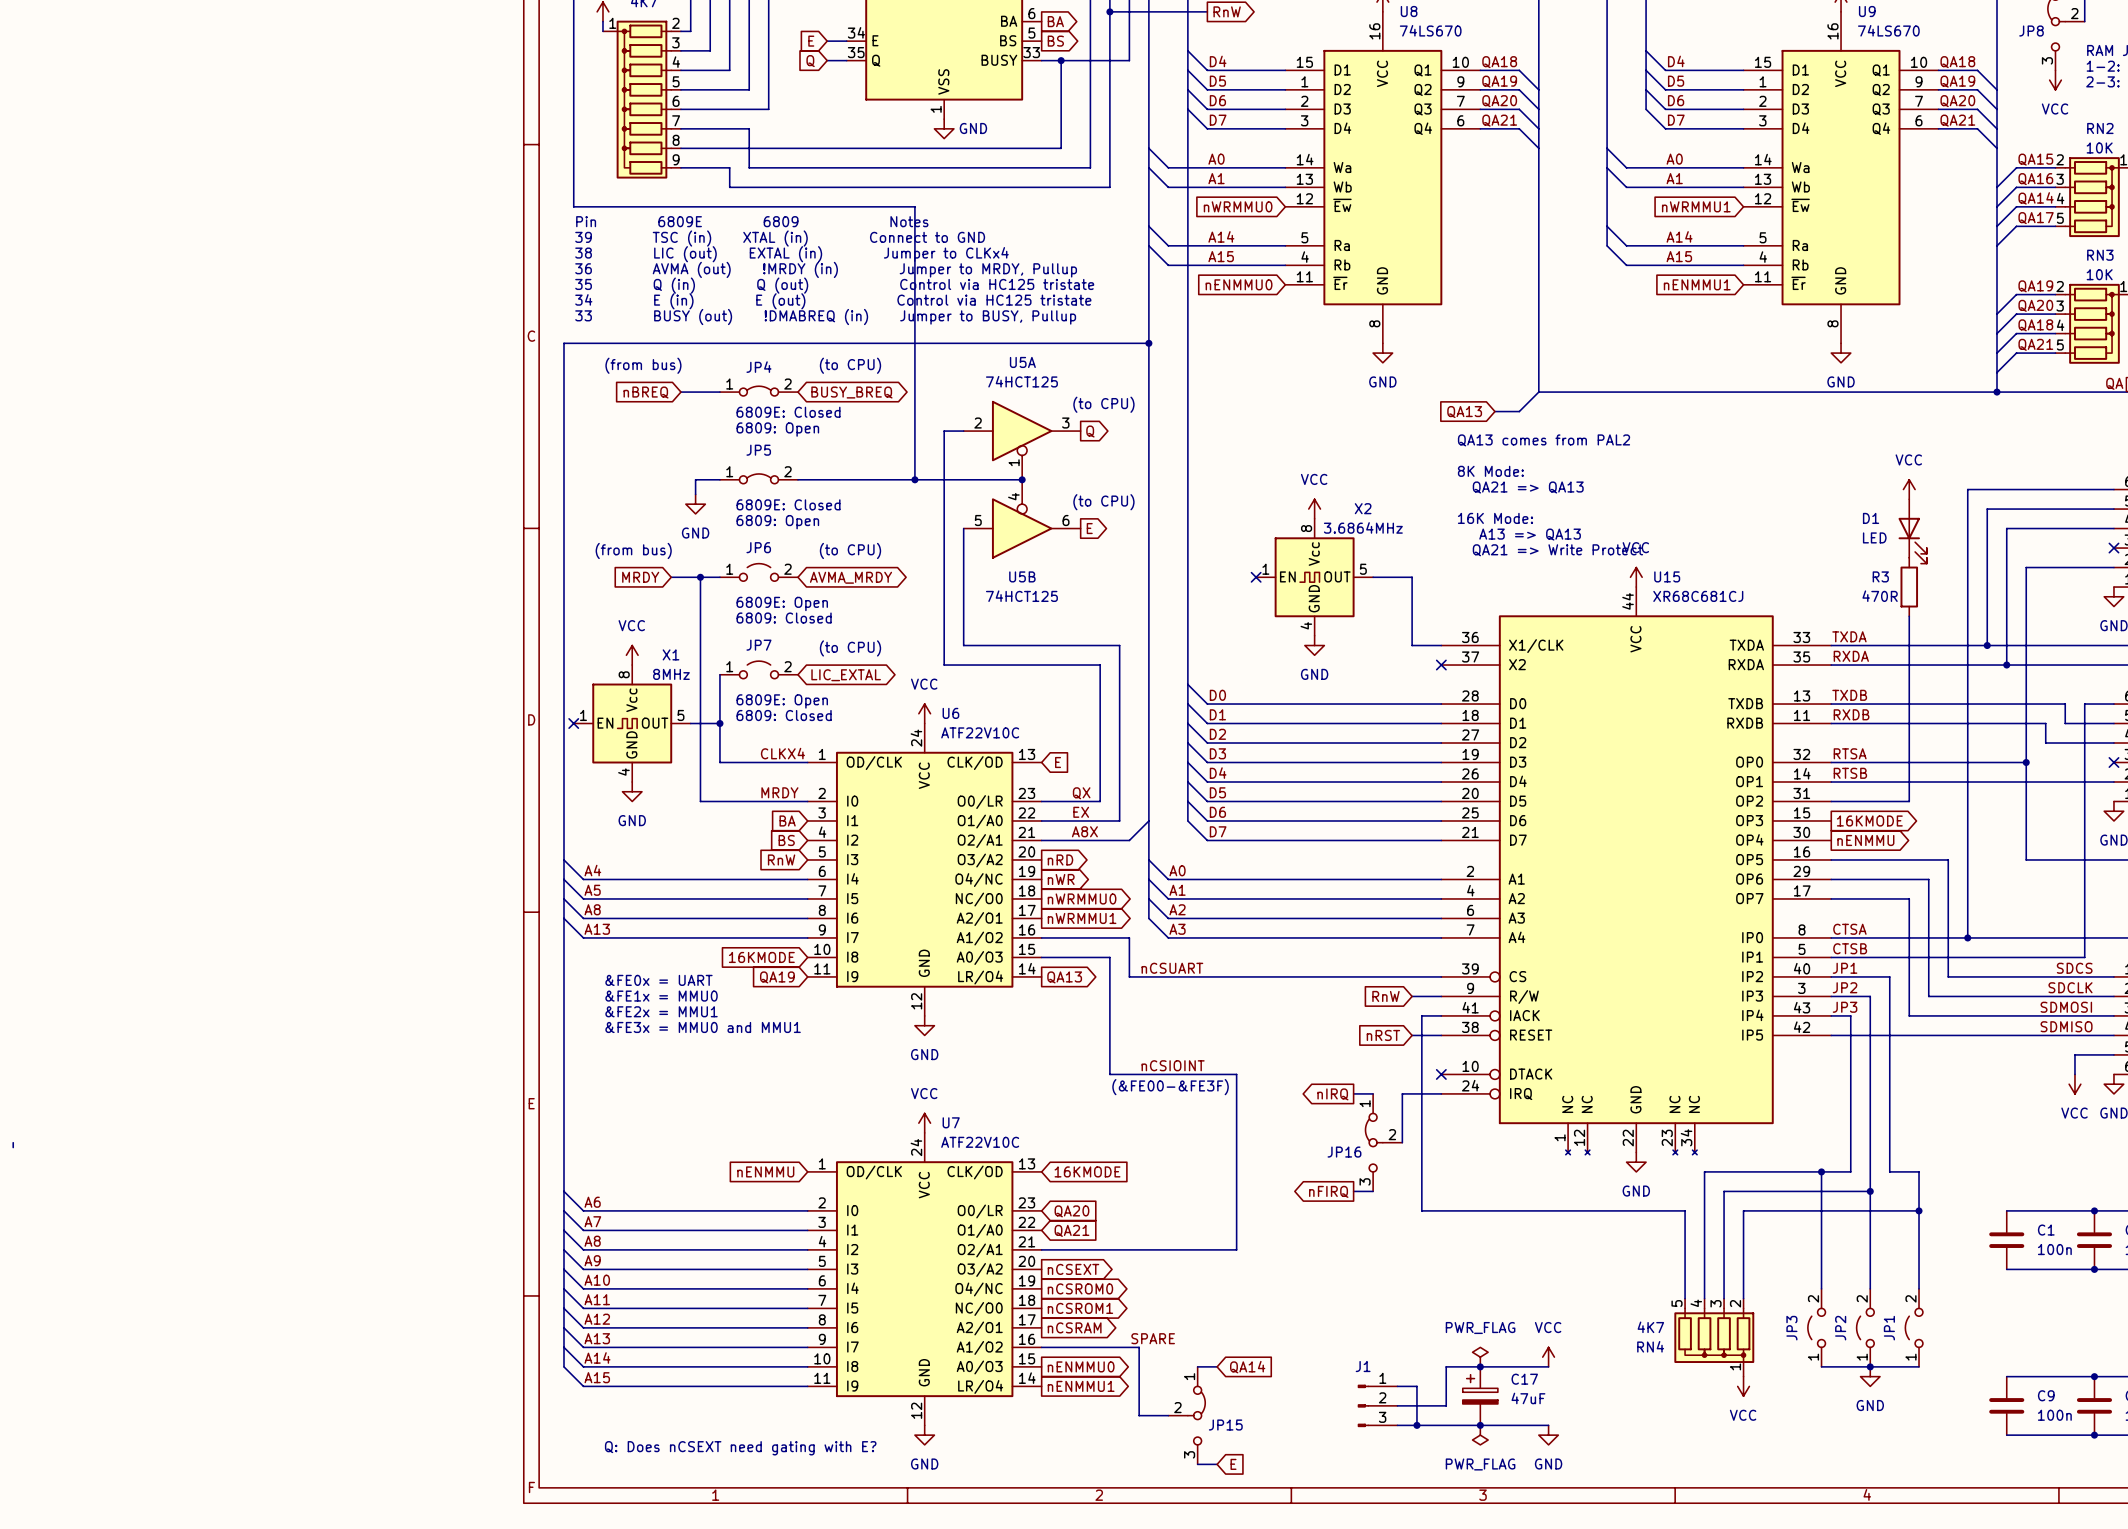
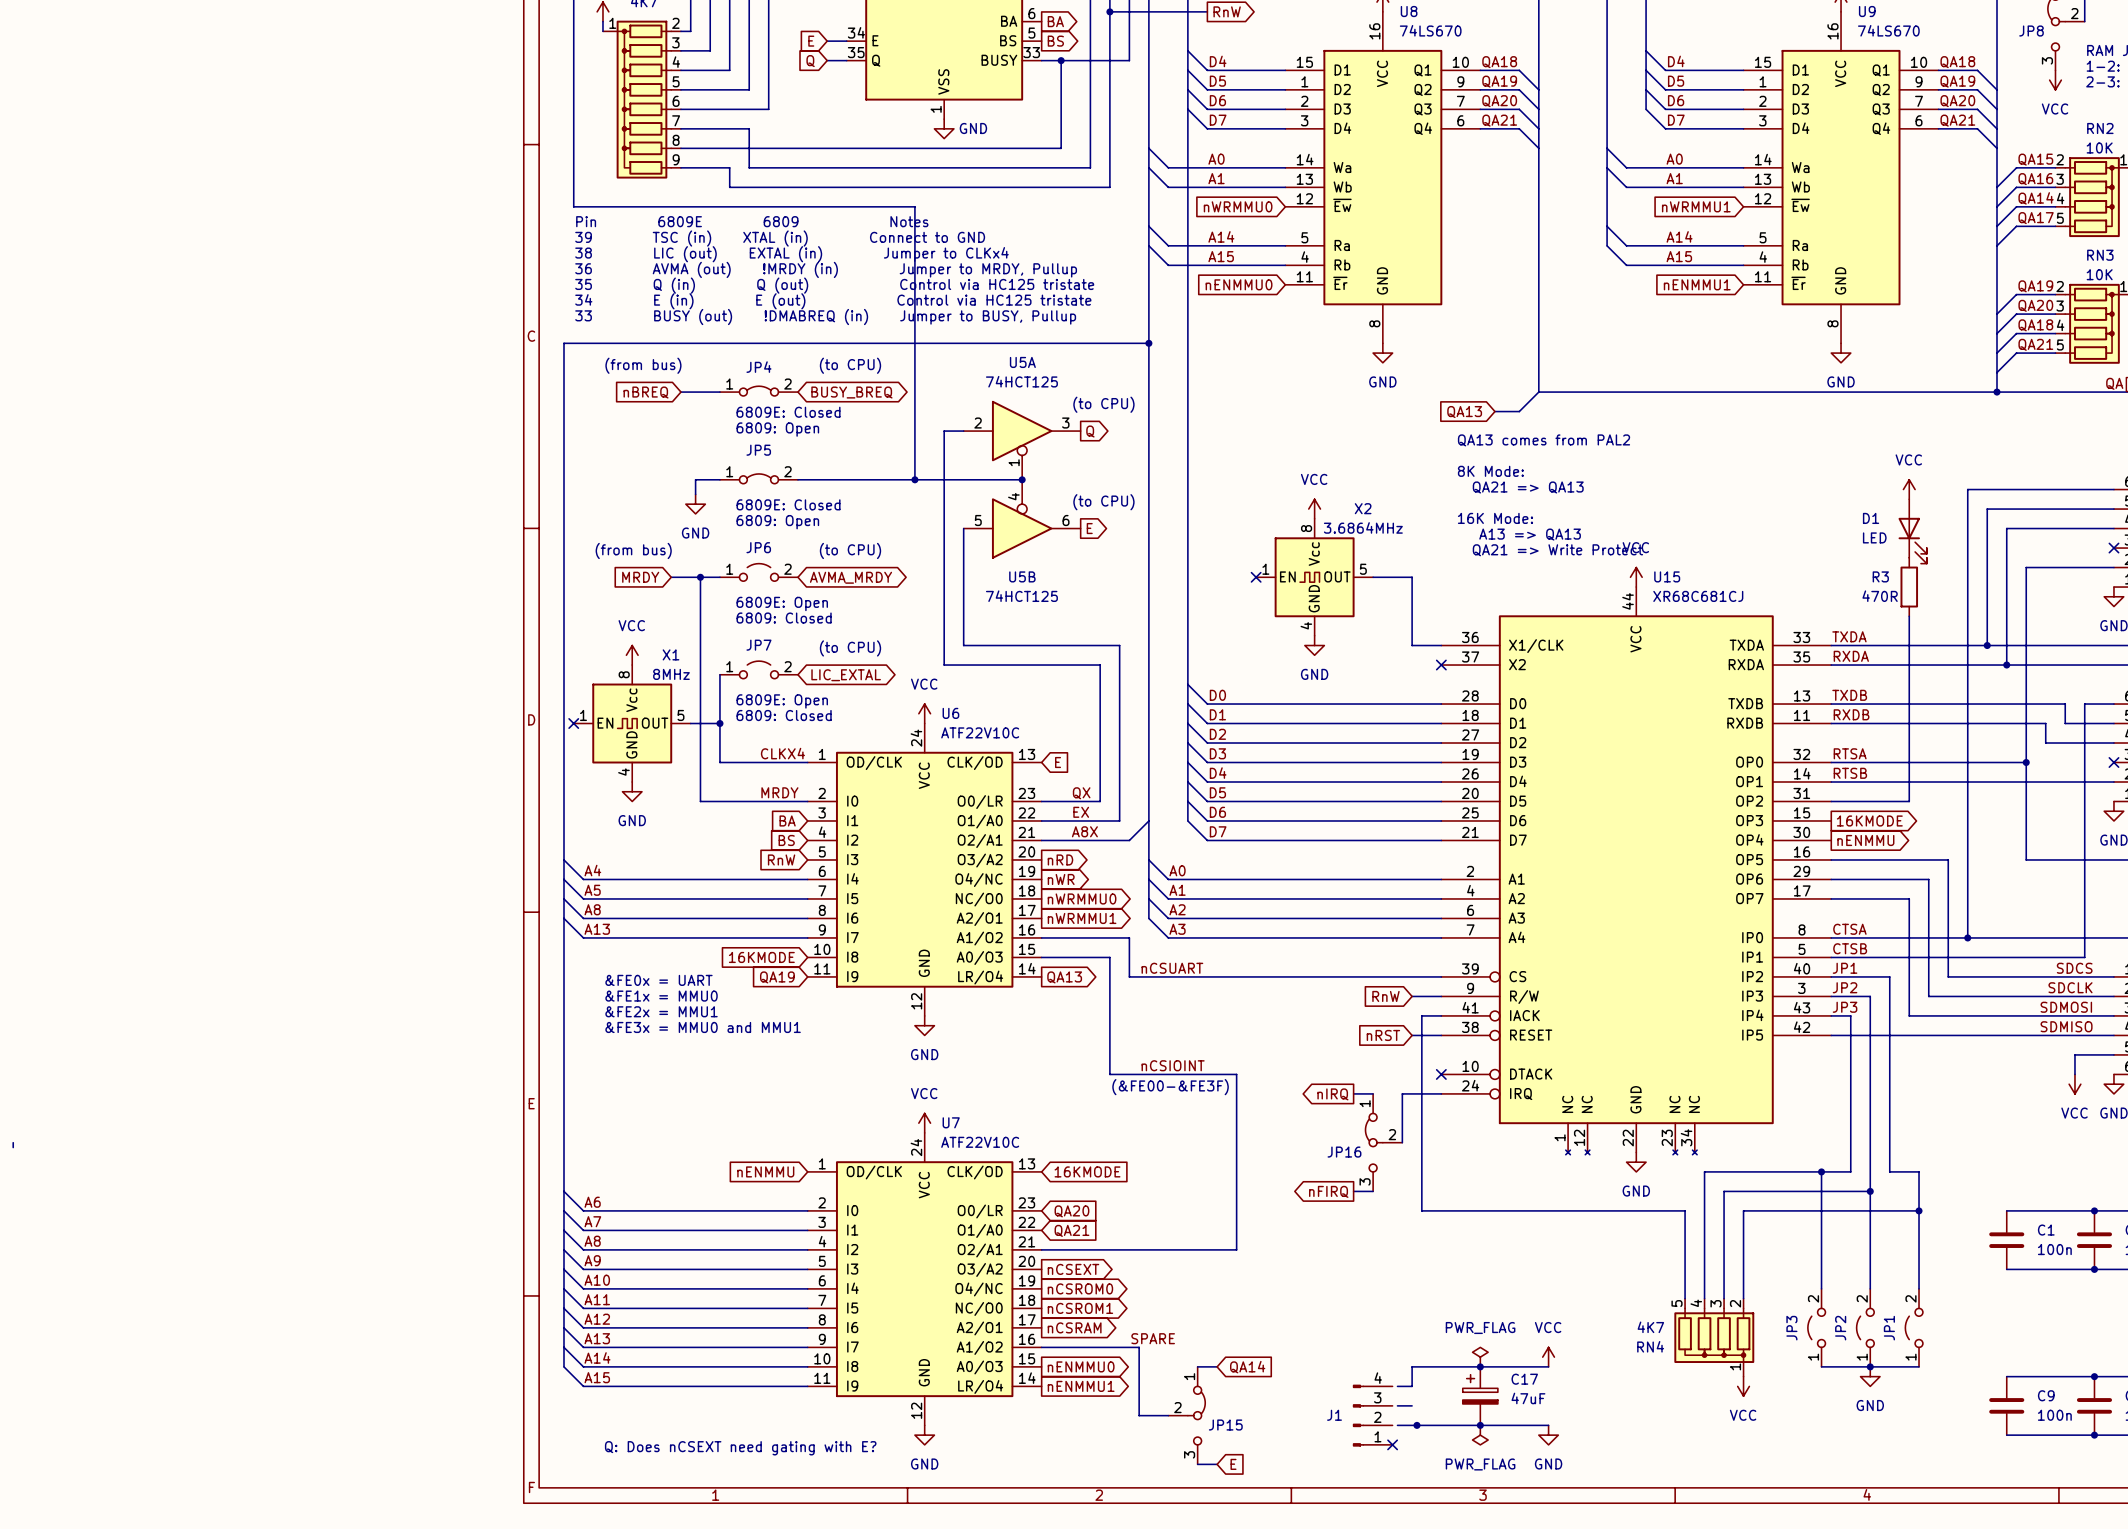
J1 name position: J1 (1363, 1366) -> J1 (1334, 1415)
wire: (1446, 1366) (1446, 1405) (1412, 1405) -> (1446, 1366) (1412, 1366) (1412, 1386)
J1 symbol: [1357, 1384, 1398, 1427] -> [1353, 1384, 1393, 1447]
wire: (1412, 1386) (1416, 1386) (1416, 1425) -> none
no-connect mark: none -> (1392, 1444)

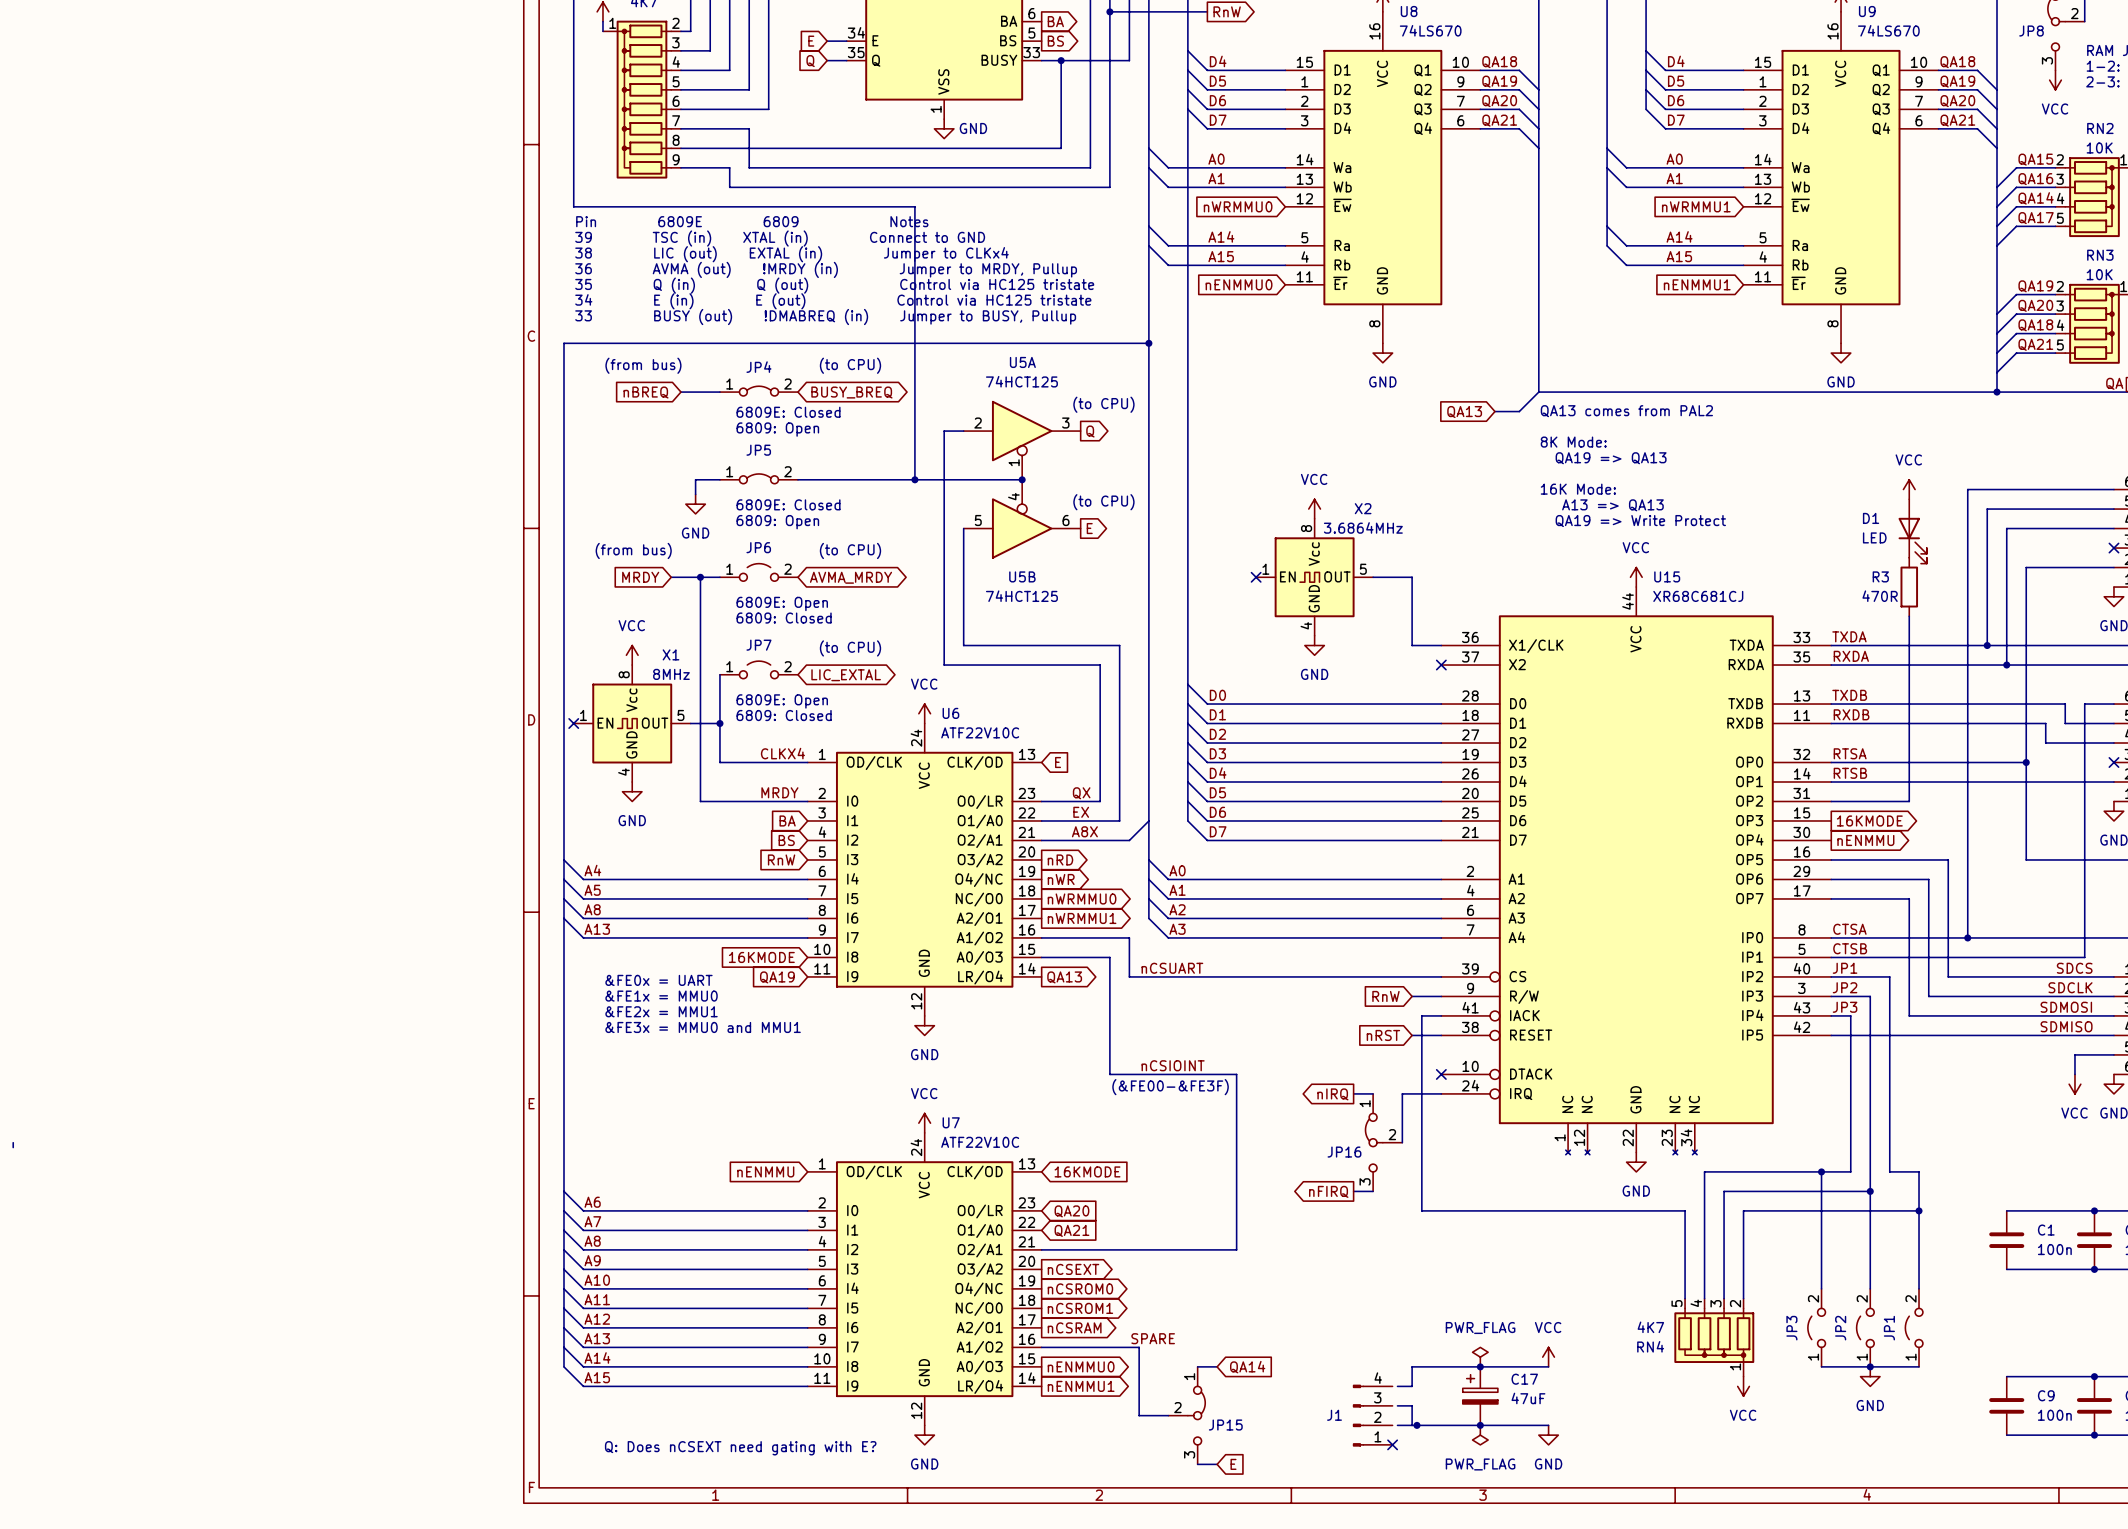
text position: QA13 comes from PAL2 (1544, 440) -> QA13 comes from PAL2 (1626, 411)
text: none -> QA19 => QA13 (1611, 458)
text position: 8K Mode: (1490, 471) -> 8K Mode: (1573, 442)
text: QA21 => QA13 (1528, 487) -> none
text position: 16K Mode: (1495, 518) -> 16K Mode: (1578, 489)
text: none -> QA19 => Write Protect (1640, 521)
text position: A13 => QA13 (1530, 534) -> A13 => QA13 (1612, 505)
text: QA21 => Write Protect (1557, 550) -> none
wire: none -> (1412, 1405) (1412, 1425)

